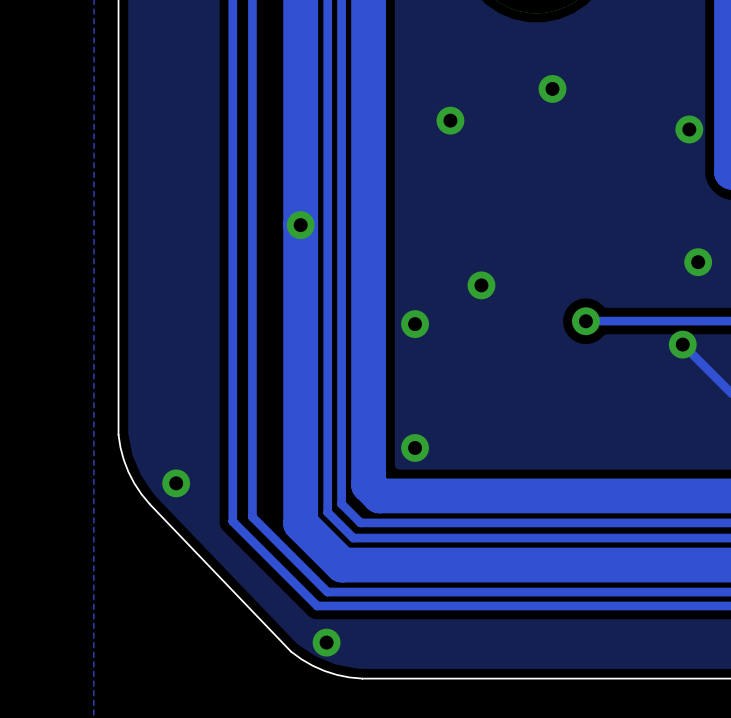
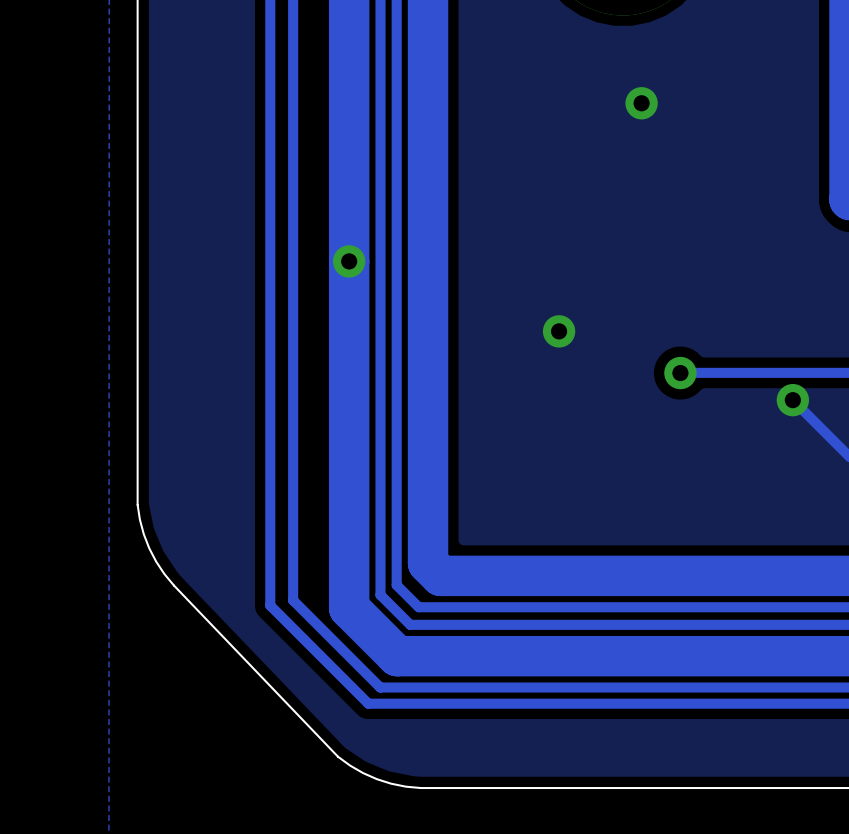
via: (450, 120) -> none
via: (689, 129) -> none
via: (698, 262) -> none
via: (415, 324) -> none
via: (415, 447) -> none
via: (176, 483) -> none
via: (326, 642) -> none

